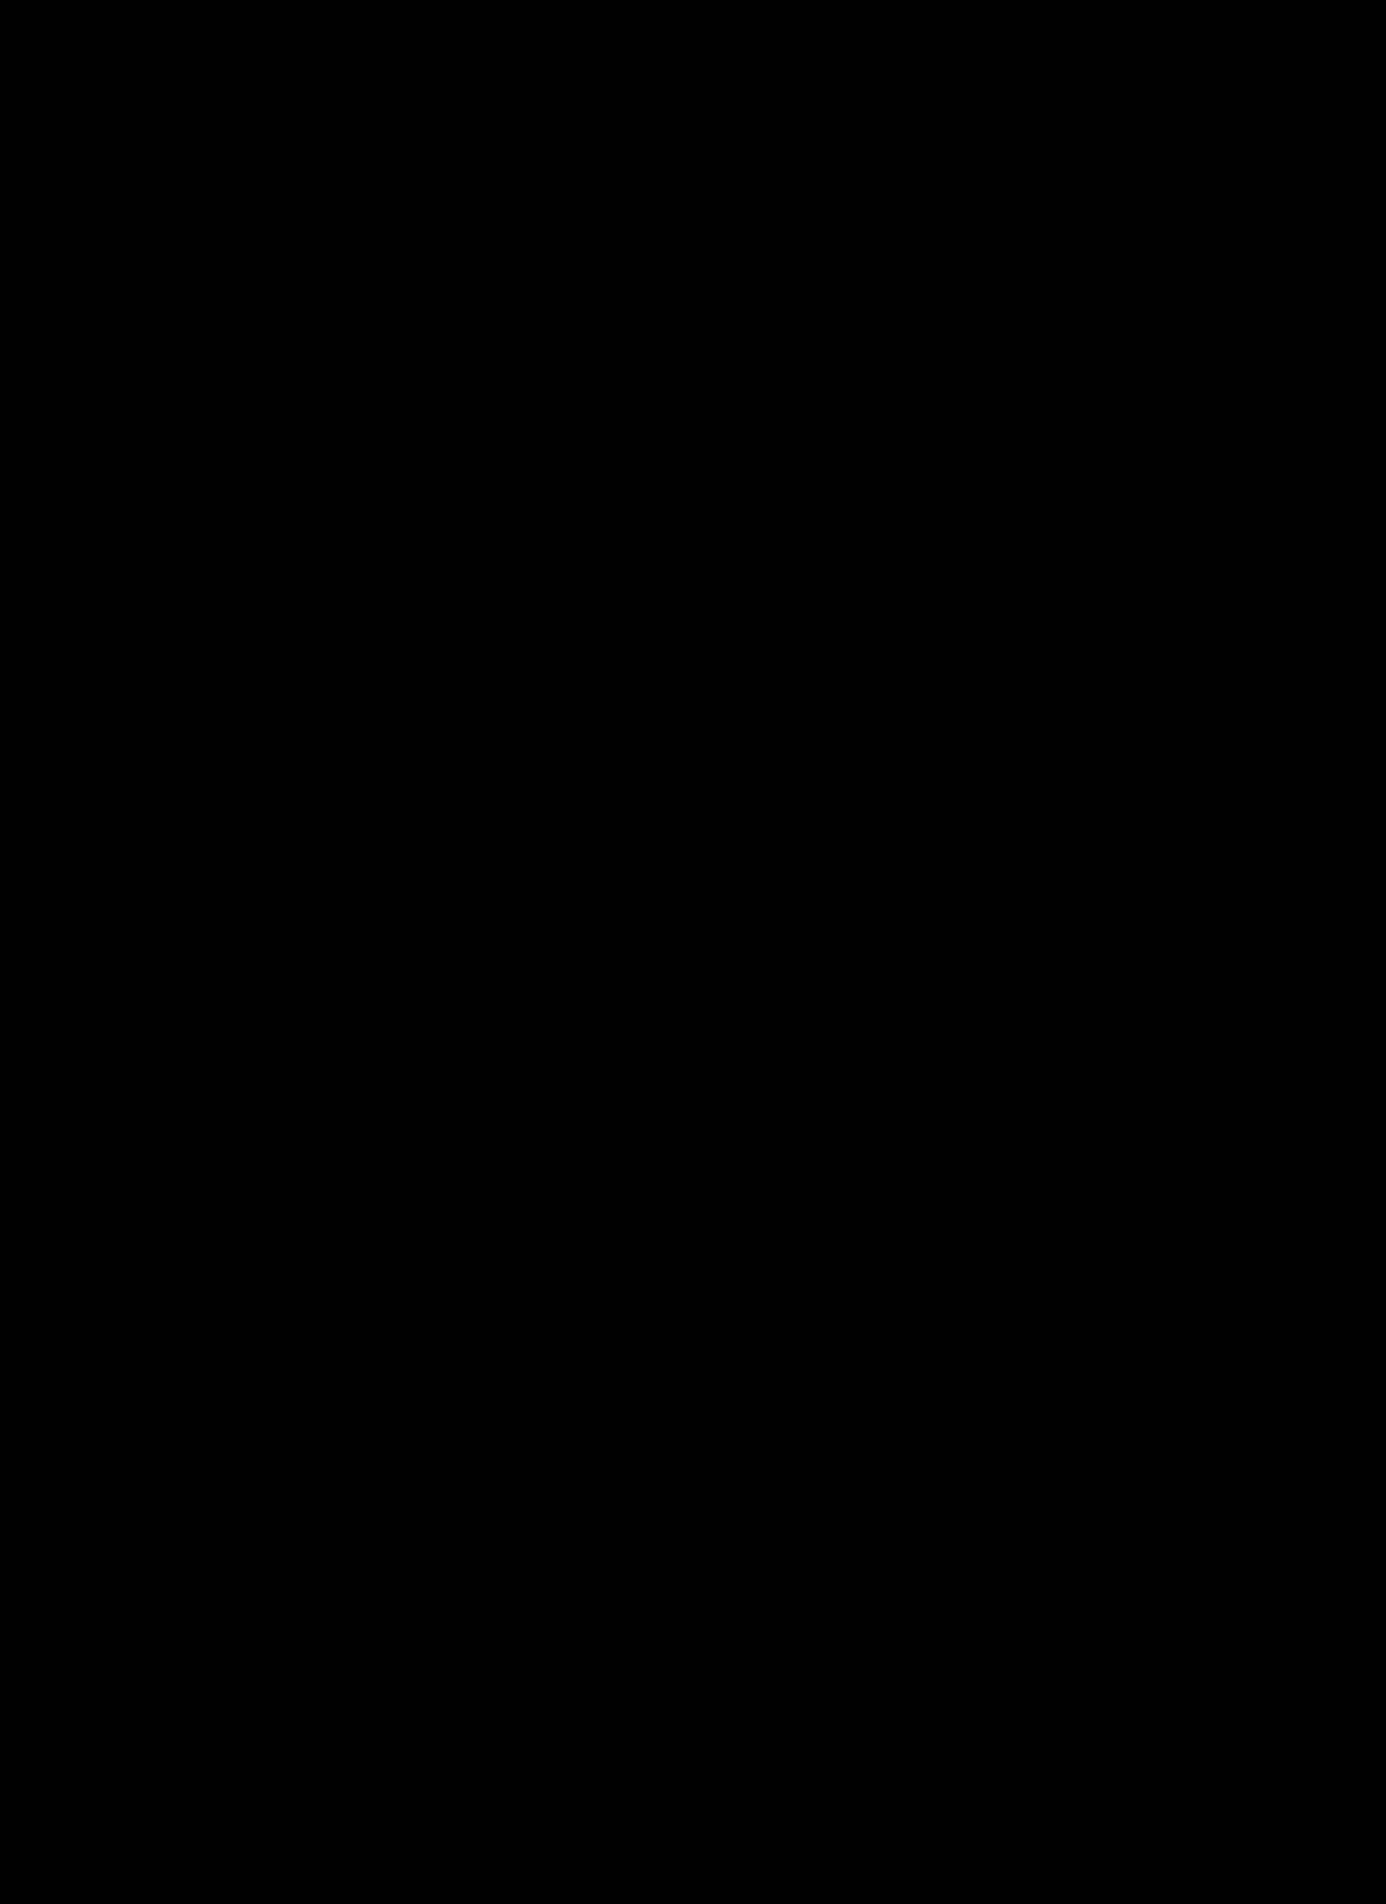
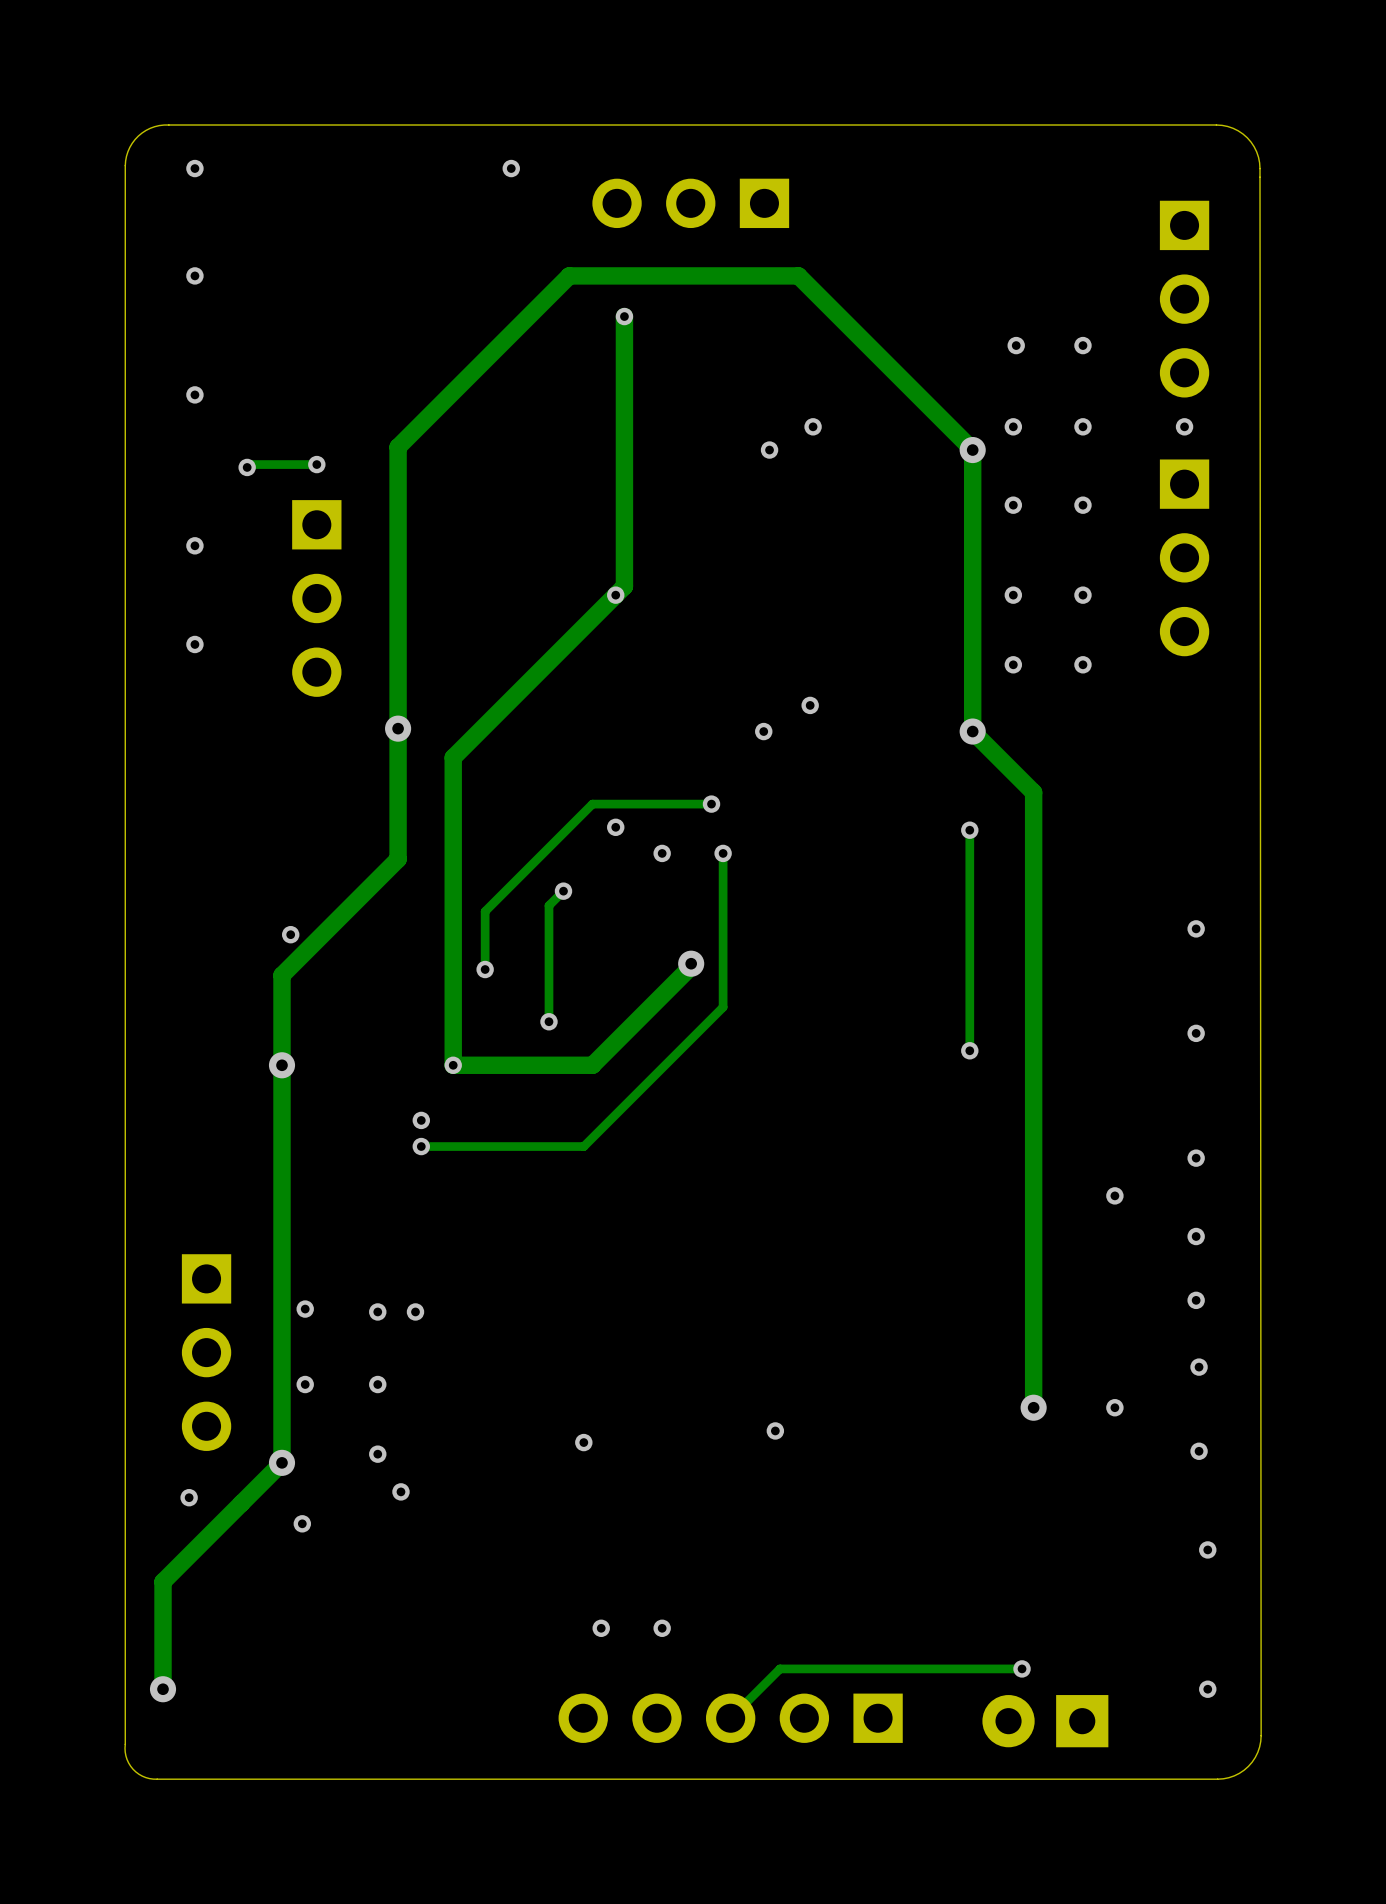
board edge: none -> (1216, 125) (164, 125) (146, 130) (132, 143) (126, 156) (125, 165) (125, 1748) (128, 1763) (138, 1774) (157, 1779) (1217, 1779) (1239, 1773) (1255, 1757) (1261, 1735) (1260, 168) (1256, 151) (1247, 137) (1233, 128) (1216, 125)
via: none -> (194, 168)
via: none -> (511, 168)
part: none -> (690, 203)
via: none -> (194, 275)
part: none -> (1184, 299)
track: none -> (624, 316) (624, 586) (453, 757) (453, 1065) (592, 1065) (691, 966) (691, 963)
via: none -> (624, 316)
via: none -> (1016, 345)
via: none -> (1082, 345)
via: none -> (194, 394)
via: none -> (813, 426)
via: none -> (1013, 426)
via: none -> (1082, 426)
via: none -> (1184, 426)
via: none -> (769, 450)
via: none -> (972, 450)
track: none -> (316, 464) (250, 464) (247, 467)
via: none -> (316, 464)
via: none -> (247, 467)
via: none -> (1013, 505)
via: none -> (1082, 505)
via: none -> (194, 545)
part: none -> (1184, 557)
via: none -> (615, 595)
via: none -> (1013, 595)
via: none -> (1082, 595)
part: none -> (316, 598)
via: none -> (194, 644)
via: none -> (1013, 664)
via: none -> (1082, 664)
via: none -> (810, 705)
via: none -> (398, 728)
via: none -> (763, 731)
via: none -> (972, 731)
track: none -> (711, 804) (592, 804) (485, 911) (485, 969)
via: none -> (711, 804)
via: none -> (615, 827)
track: none -> (969, 830) (969, 1050)
via: none -> (969, 830)
via: none -> (662, 853)
track: none -> (723, 853) (723, 1007) (583, 1146) (421, 1146)
via: none -> (723, 853)
track: none -> (563, 891) (548, 905) (548, 1021)
via: none -> (563, 891)
via: none -> (1196, 928)
via: none -> (290, 934)
via: none -> (691, 963)
via: none -> (485, 969)
via: none -> (548, 1021)
via: none -> (1196, 1033)
via: none -> (969, 1050)
via: none -> (282, 1065)
via: none -> (453, 1065)
via: none -> (421, 1120)
via: none -> (421, 1146)
via: none -> (1196, 1158)
via: none -> (1114, 1195)
via: none -> (1196, 1236)
via: none -> (1196, 1300)
via: none -> (305, 1309)
via: none -> (377, 1311)
via: none -> (415, 1311)
part: none -> (206, 1352)
via: none -> (1199, 1367)
via: none -> (305, 1384)
via: none -> (377, 1384)
track: none -> (1033, 1407) (1033, 792) (972, 731) (972, 450) (798, 275) (569, 275) (398, 447) (398, 859) (282, 975) (282, 1462) (163, 1581) (163, 1689)
via: none -> (1033, 1407)
via: none -> (1114, 1407)
via: none -> (775, 1430)
via: none -> (583, 1442)
via: none -> (1199, 1451)
via: none -> (377, 1454)
via: none -> (282, 1462)
via: none -> (400, 1491)
via: none -> (189, 1497)
via: none -> (302, 1523)
via: none -> (1207, 1549)
via: none -> (601, 1628)
via: none -> (662, 1628)
track: none -> (1022, 1668) (779, 1668) (730, 1718)
via: none -> (1022, 1668)
via: none -> (163, 1689)
via: none -> (1207, 1689)
part: none -> (730, 1718)
part: none -> (1045, 1721)

